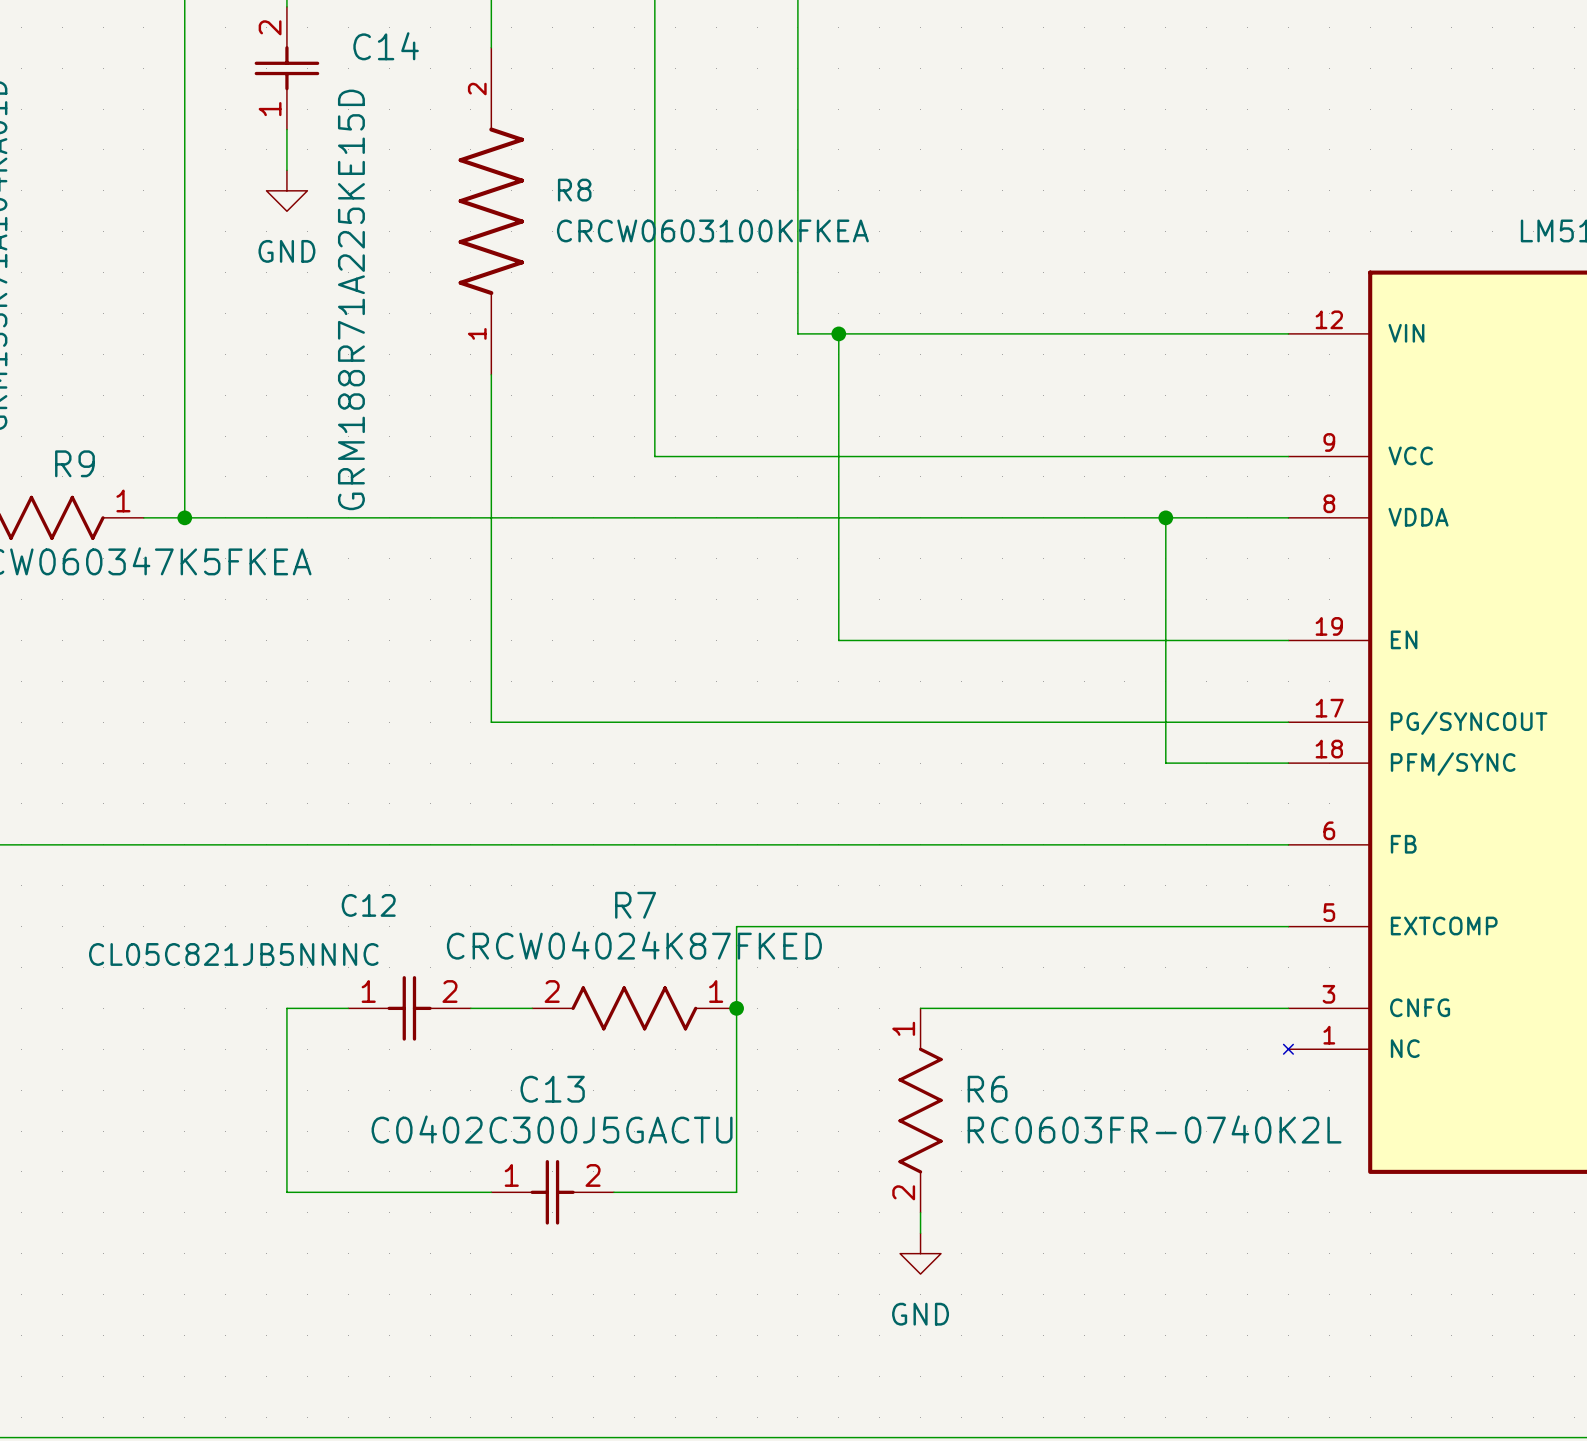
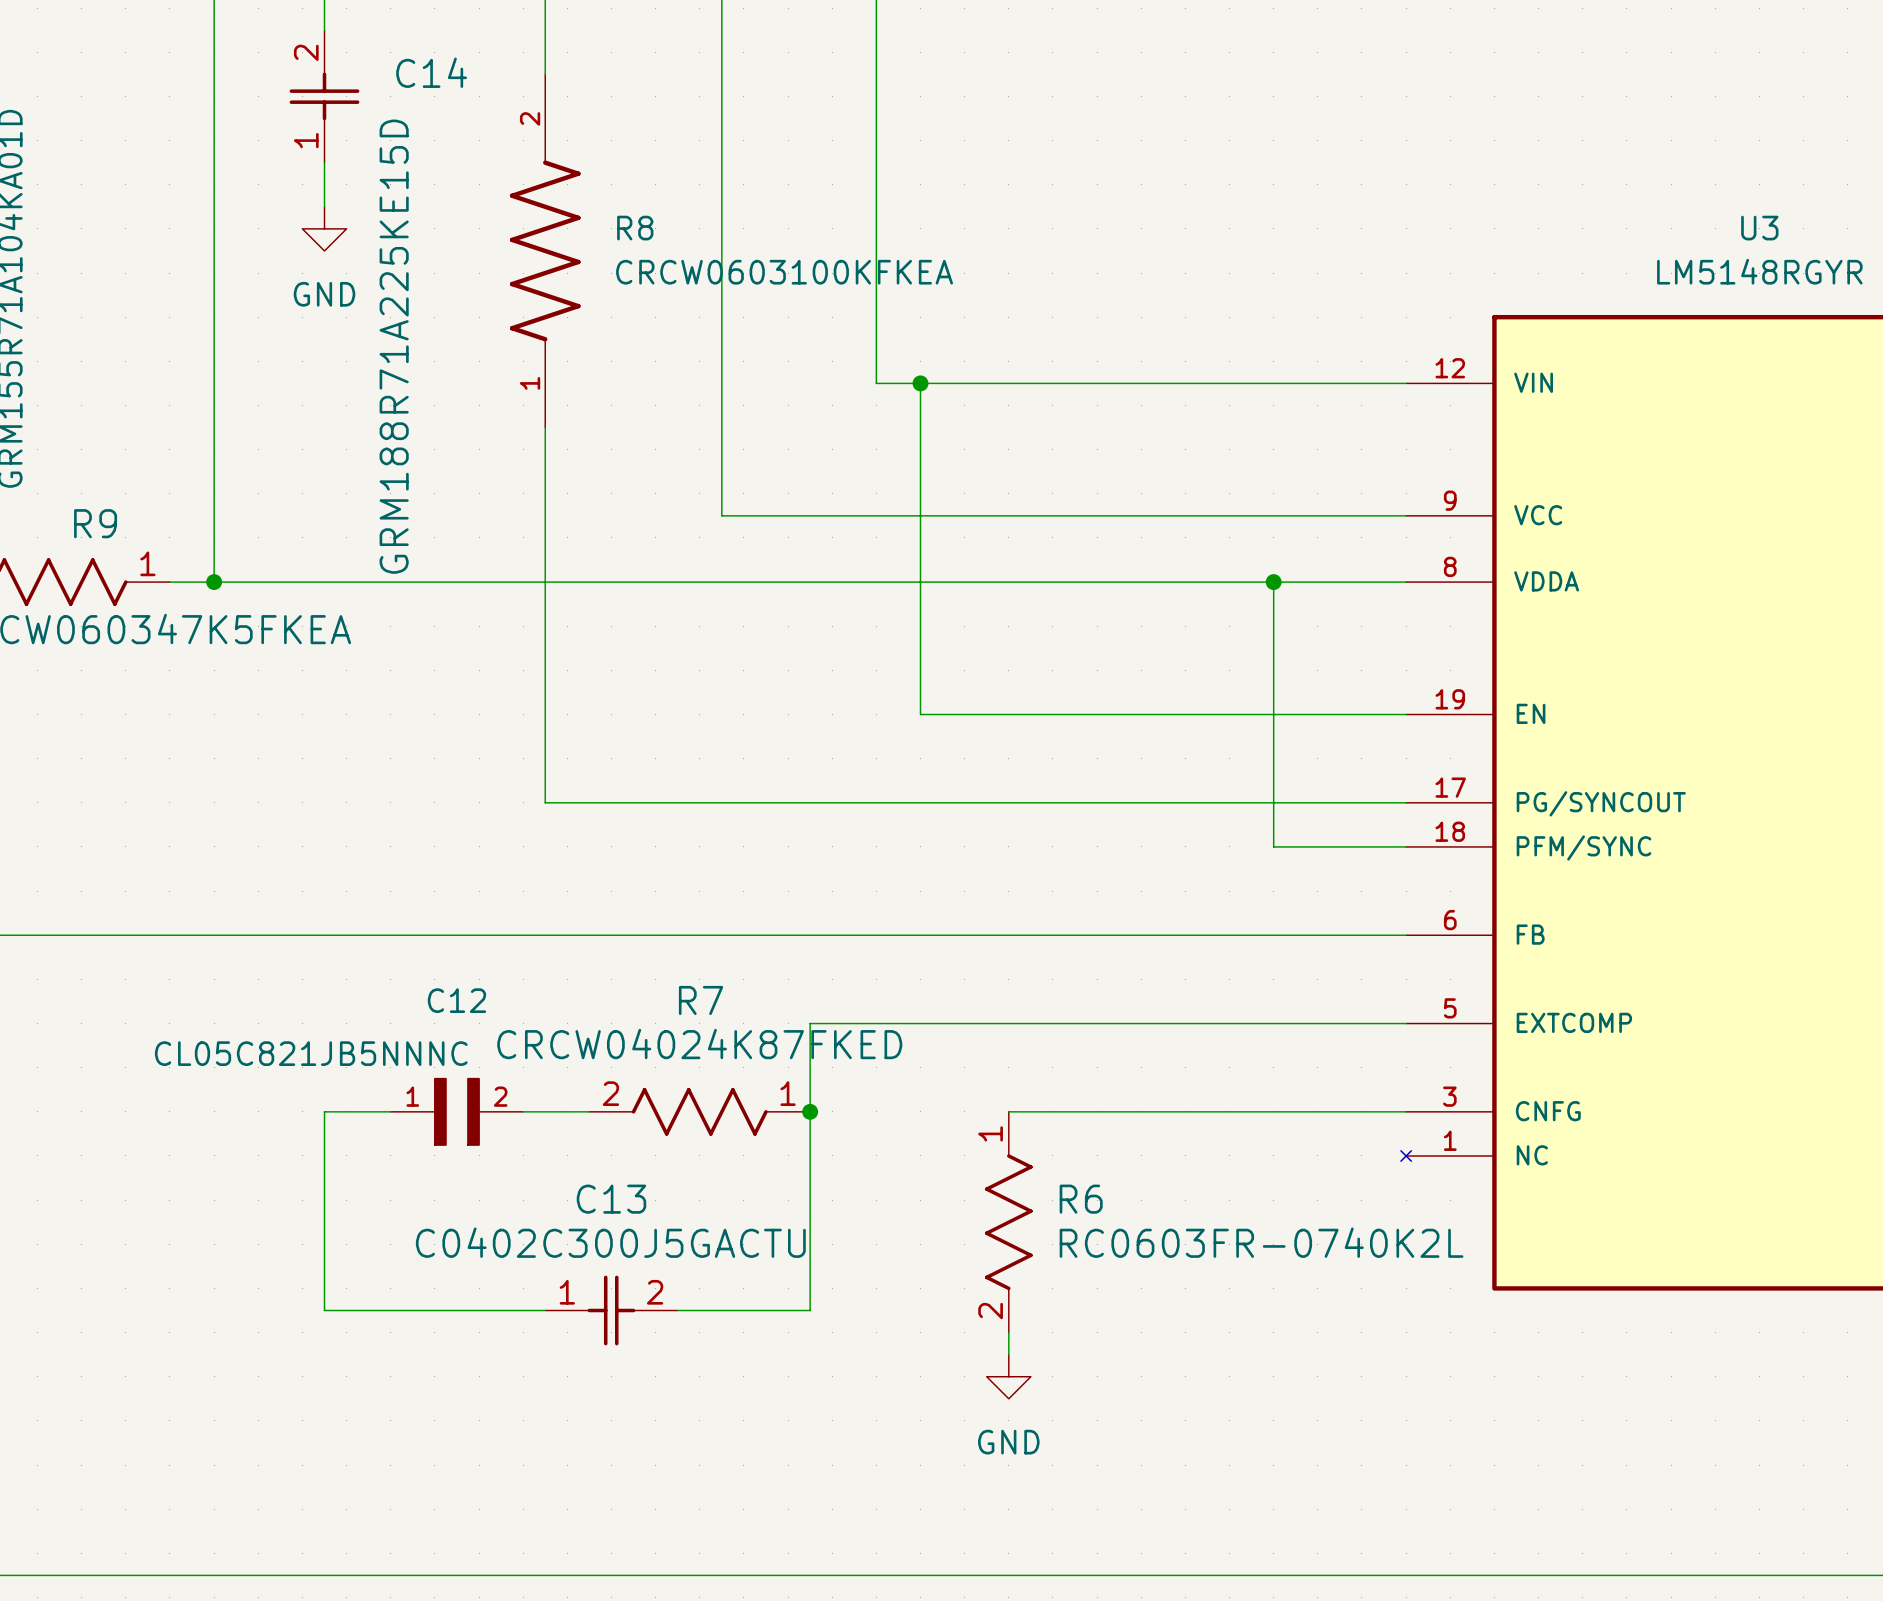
C12 name position: C12 (368, 905) -> C12 (456, 1000)
C12 value position: CL05C821JB5NNNC (233, 954) -> CL05C821JB5NNNC (311, 1053)
C12 symbol: [348, 976, 471, 1041] -> [390, 1077, 524, 1146]

